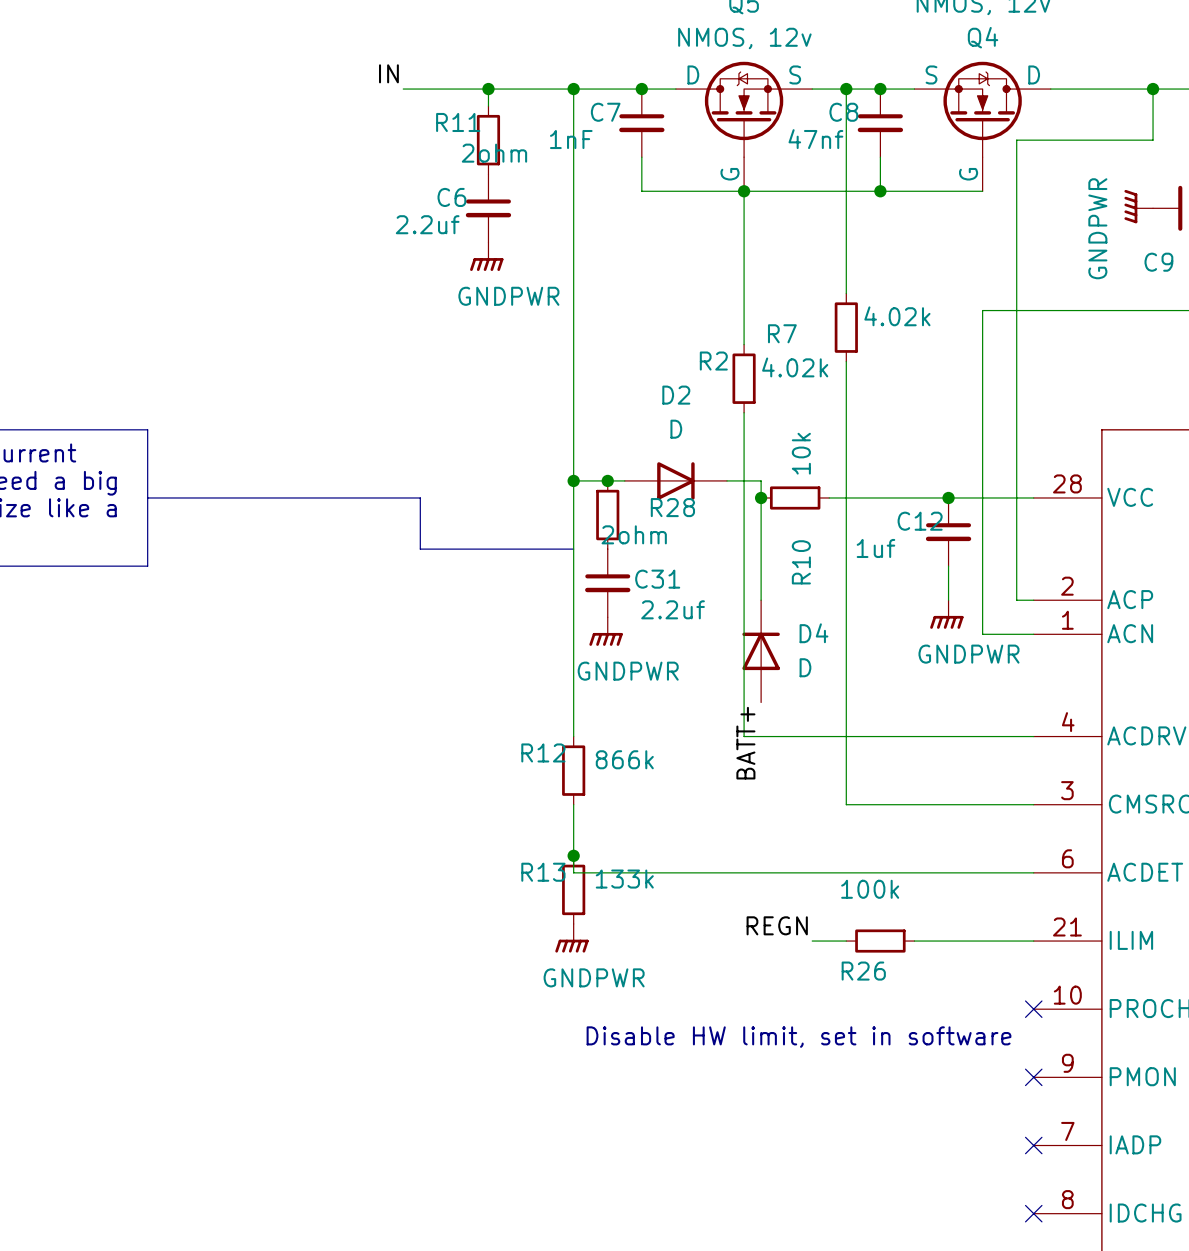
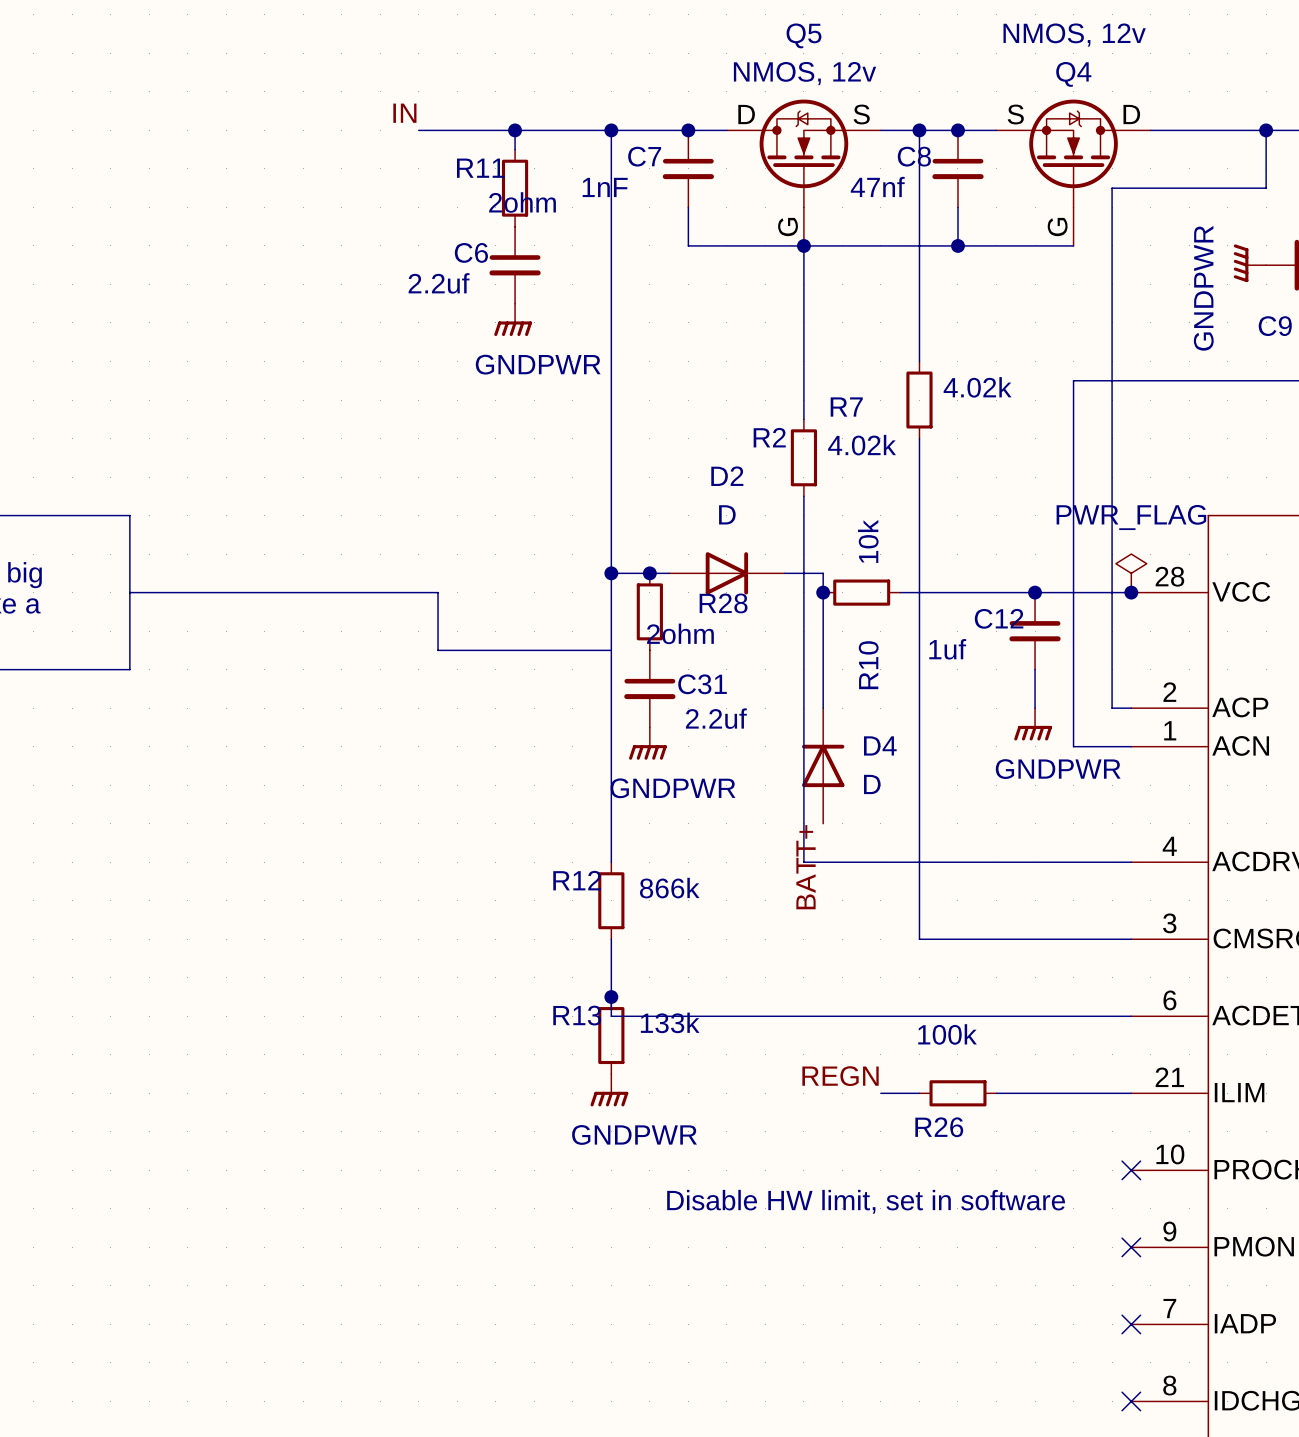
power symbol: none -> PWR_FLAG (1131, 573)
junction: none -> (1131, 592)

